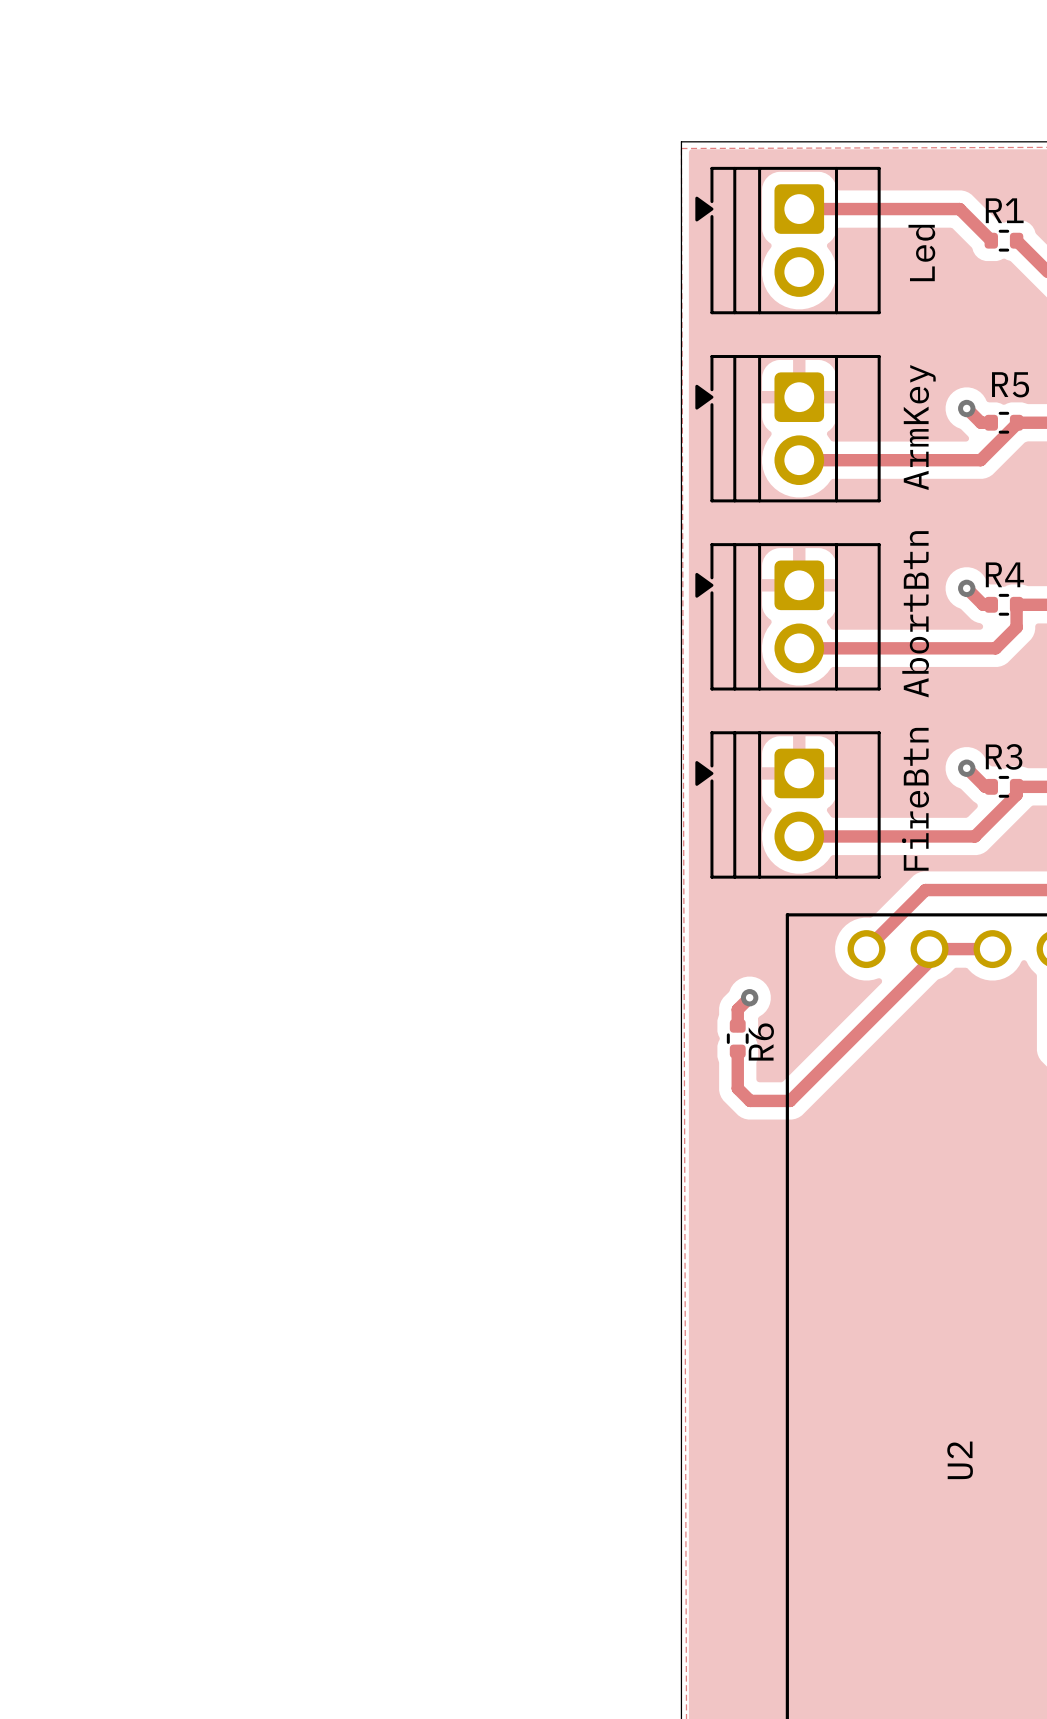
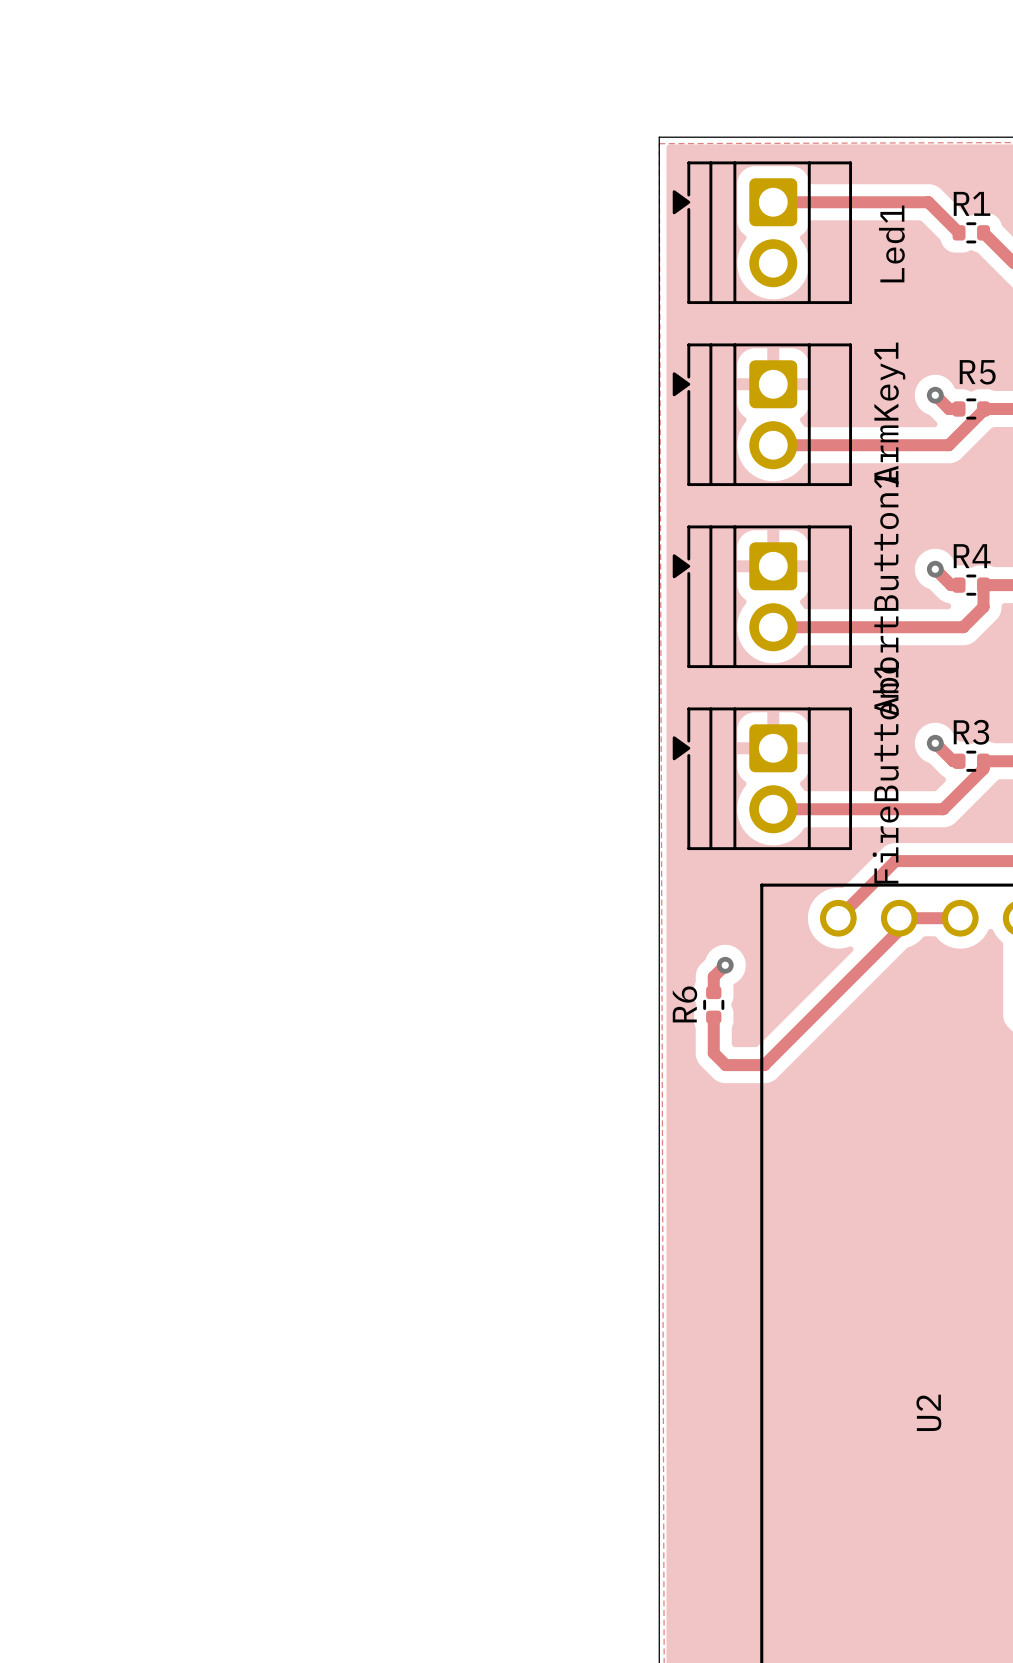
Led name: Led (921, 253) -> Led1 (891, 243)
ArmKey name: ArmKey (919, 427) -> ArmKey1 (889, 413)
AbortBtn name: AbortBtn (915, 614) -> AbortButton1 (885, 593)
FireBtn name: FireBtn (915, 799) -> FireButton1 (885, 772)
R6 name position: R6 (761, 1042) -> R6 (684, 1004)

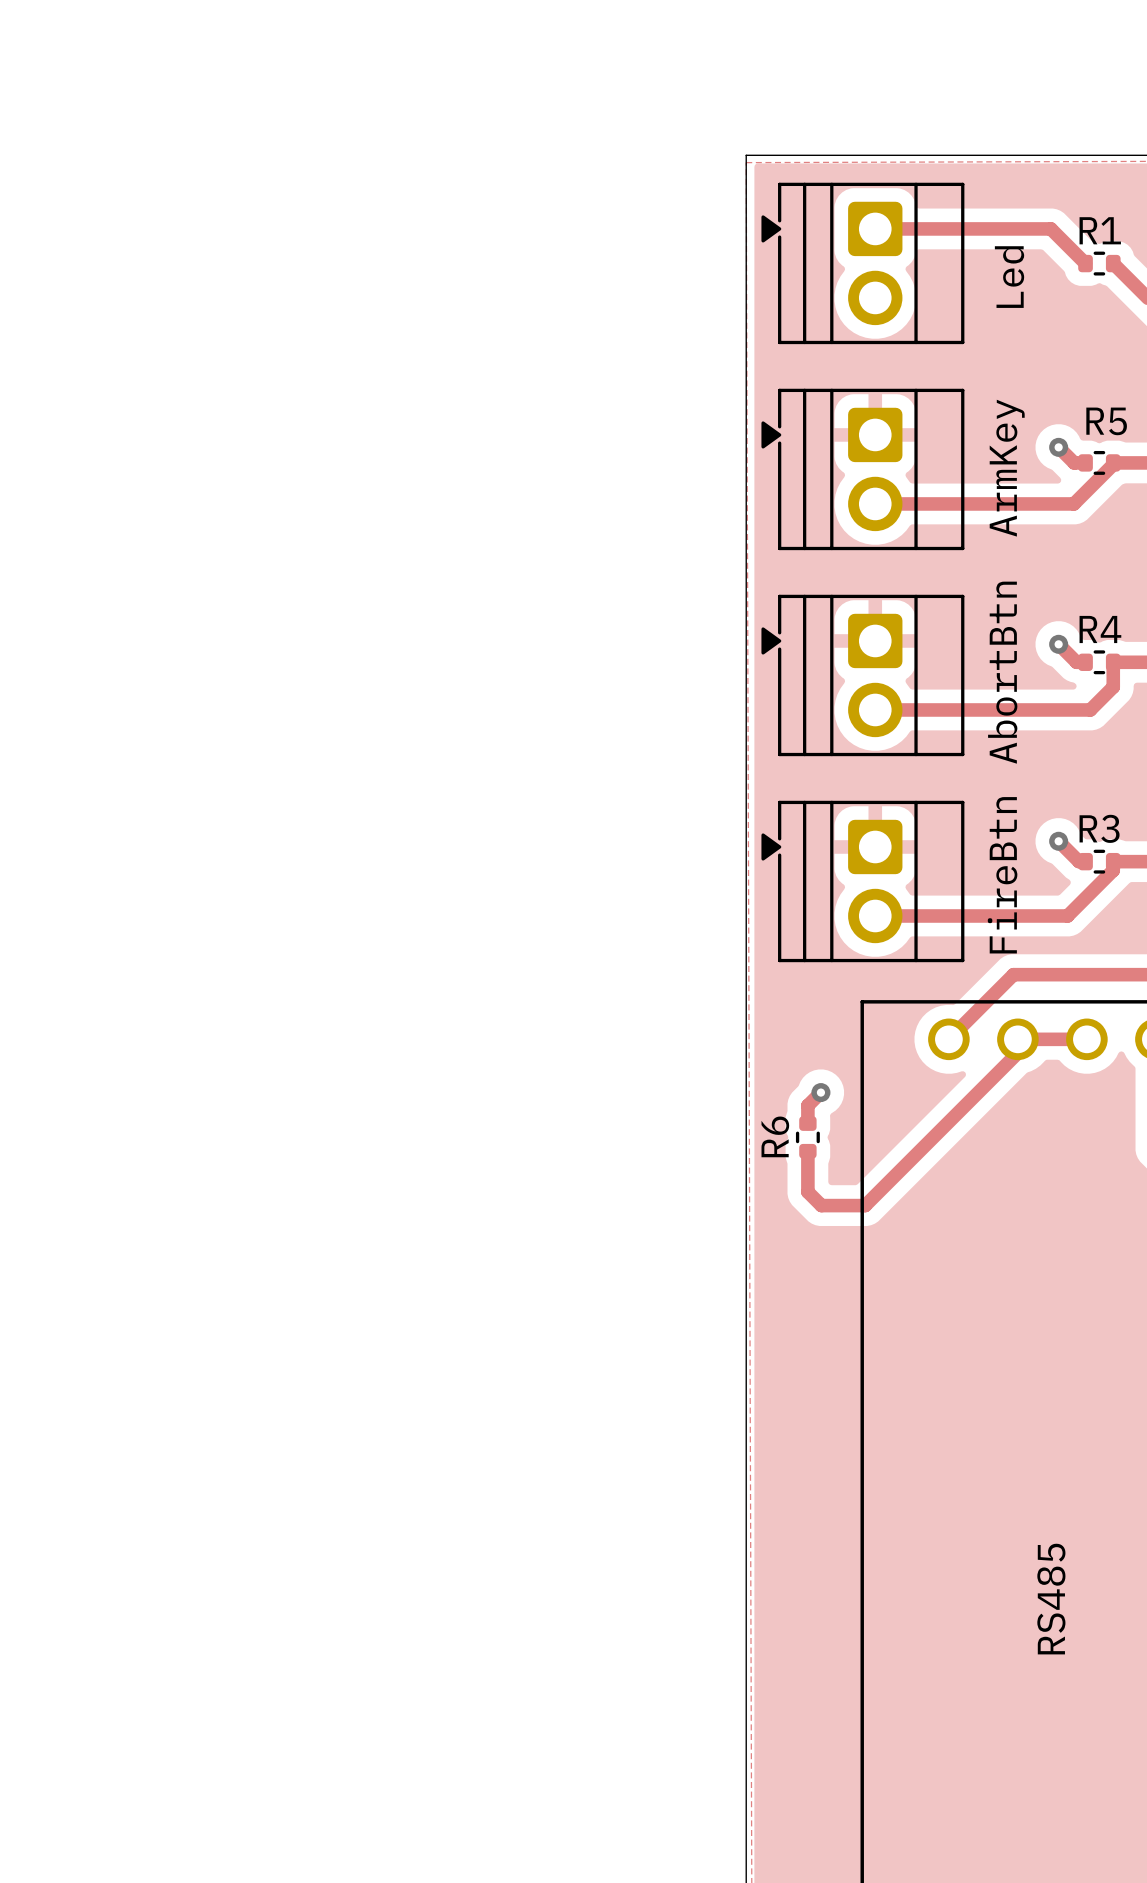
Led1 name: Led1 (891, 243) -> Led (1009, 277)
ArmKey1 name: ArmKey1 (889, 413) -> ArmKey (1007, 468)
AbortButton1 name: AbortButton1 (885, 593) -> AbortBtn (1002, 672)
FireButton1 name: FireButton1 (885, 772) -> FireBtn (1002, 875)
U2 name: U2 (928, 1412) -> RS485 (1051, 1599)

